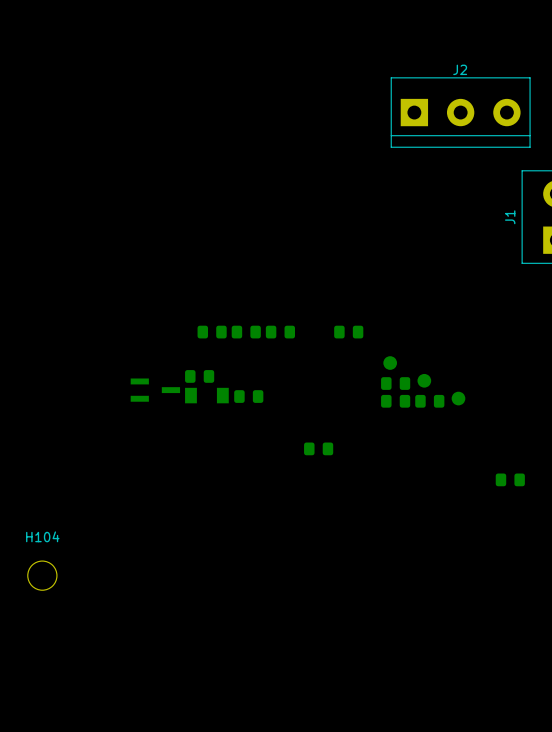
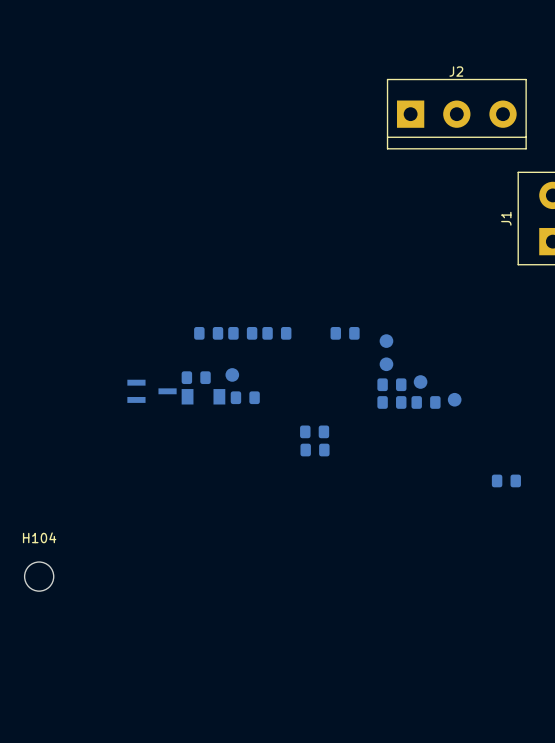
part: none -> (386, 341)
part: none -> (232, 374)
part: none -> (314, 431)

